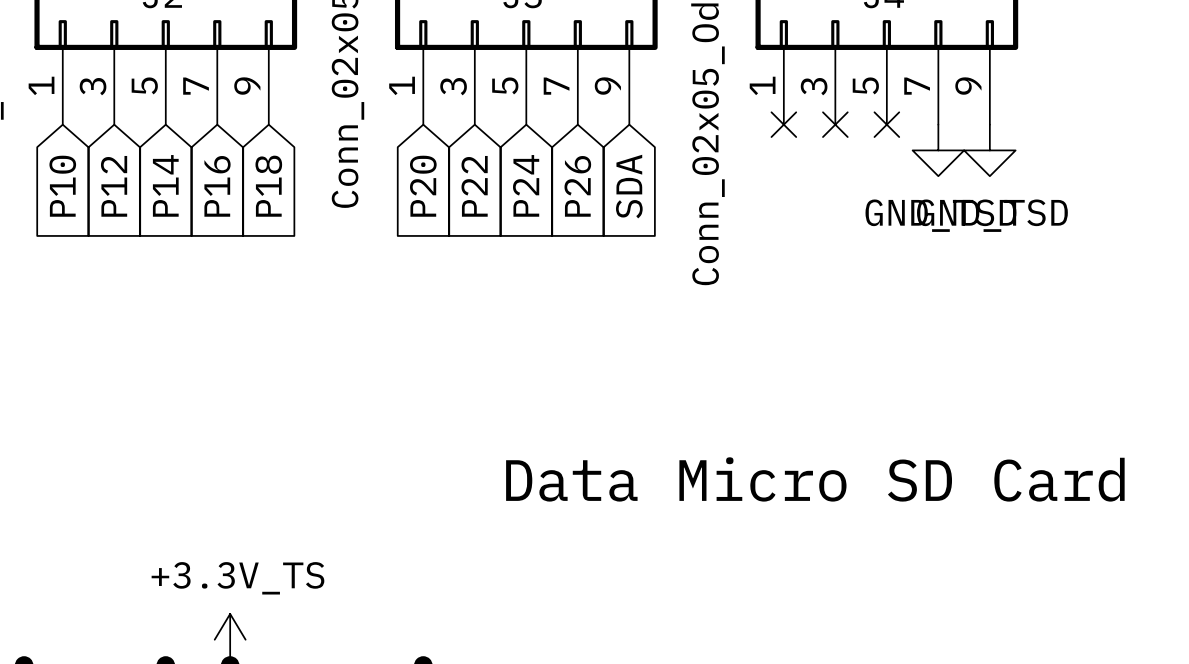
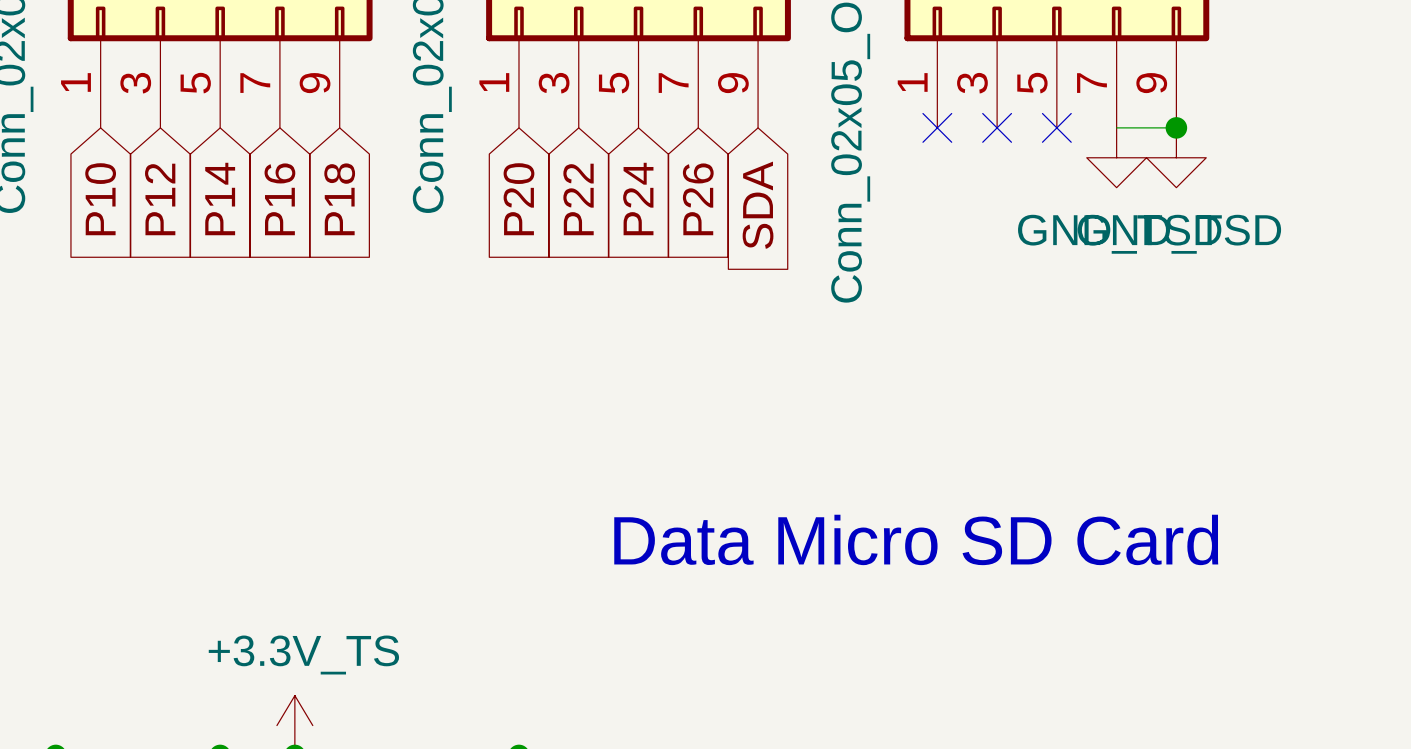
wire: none -> (1116, 127) (1176, 127)
junction: none -> (1176, 127)

